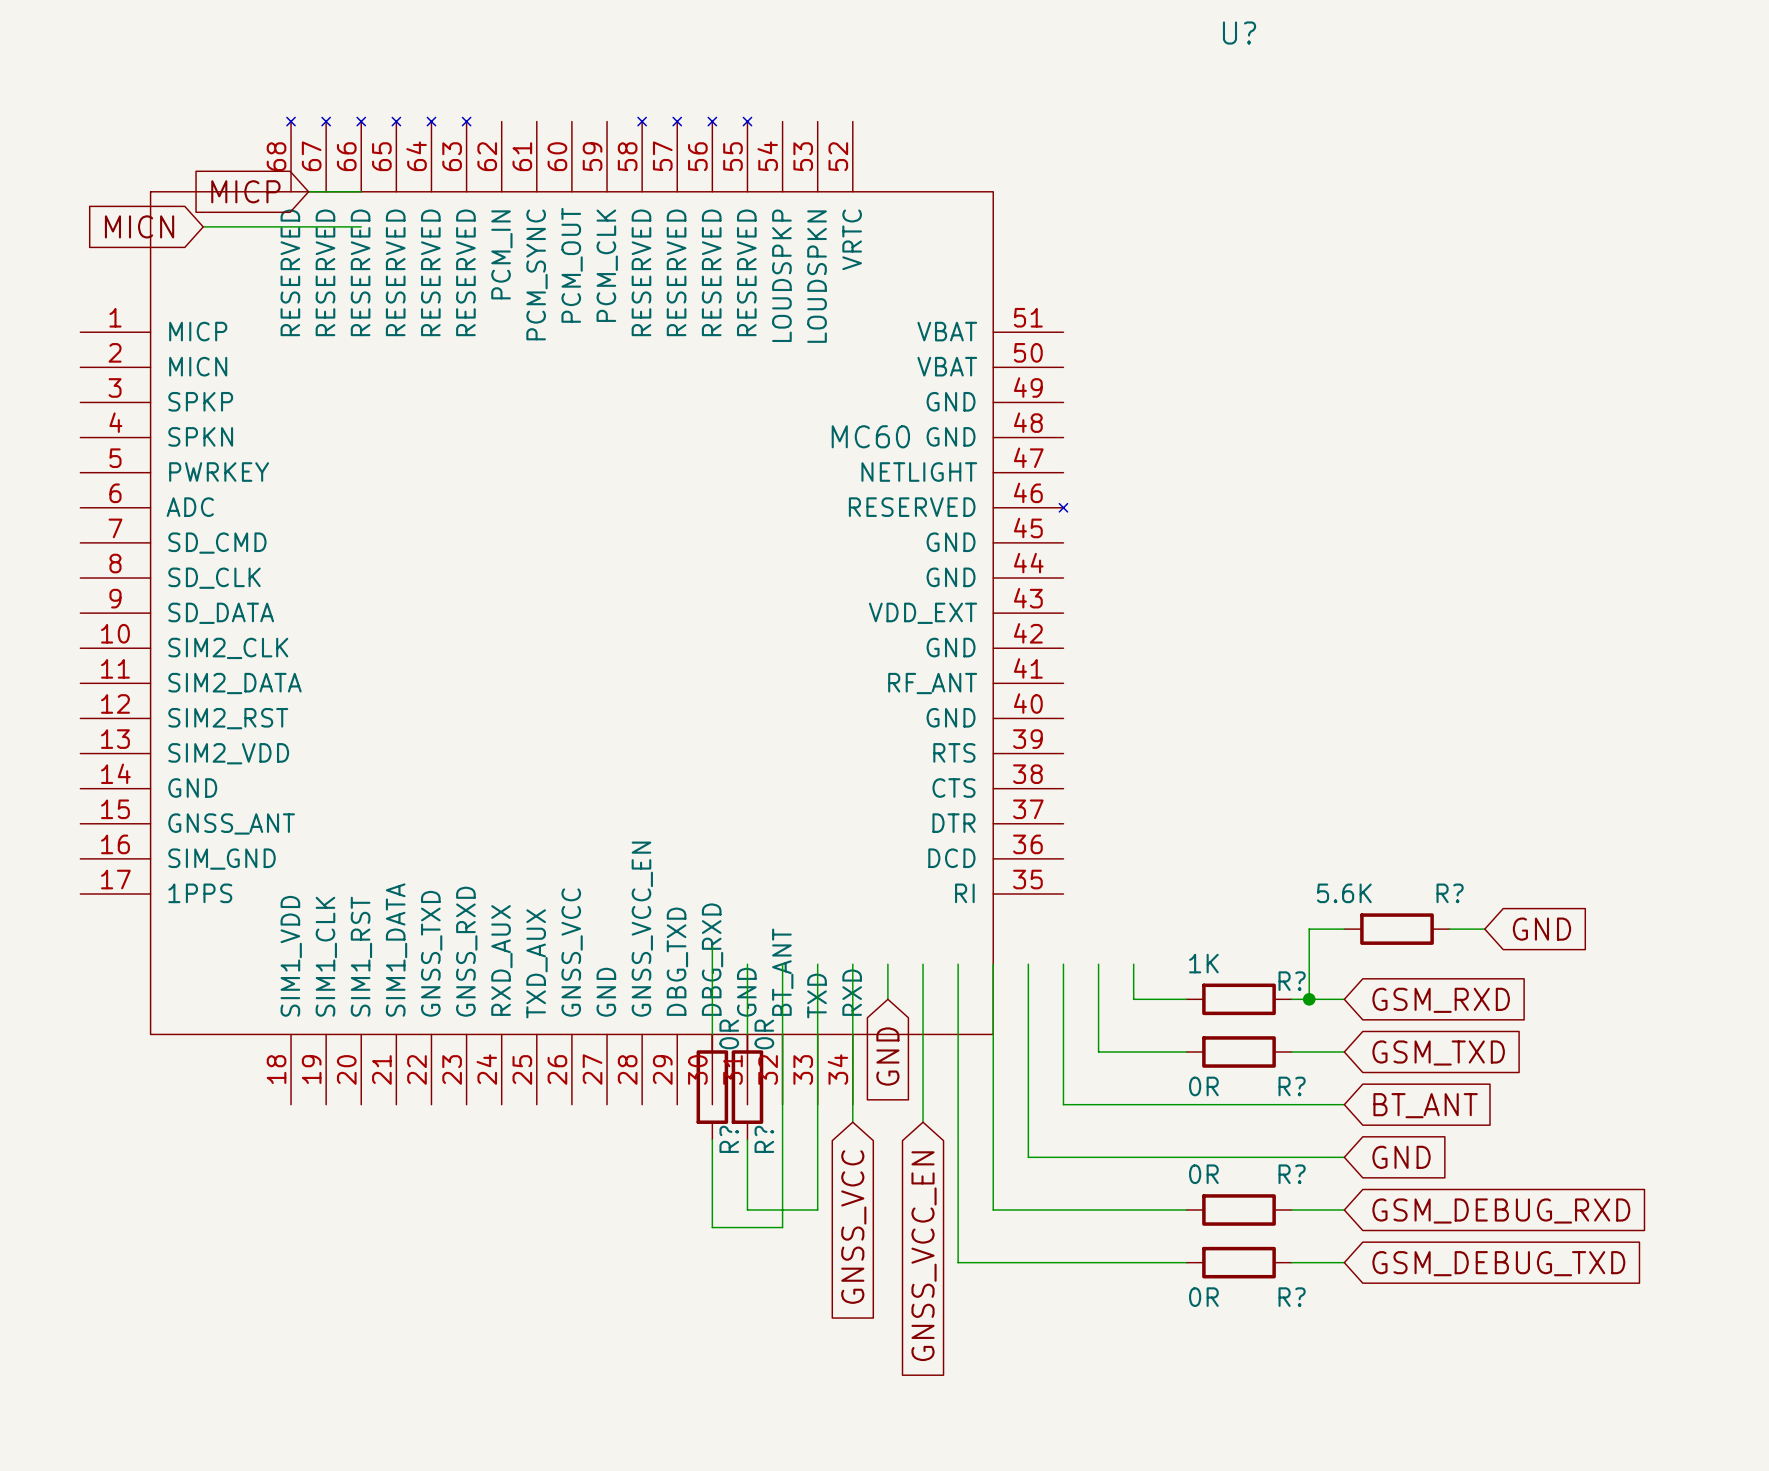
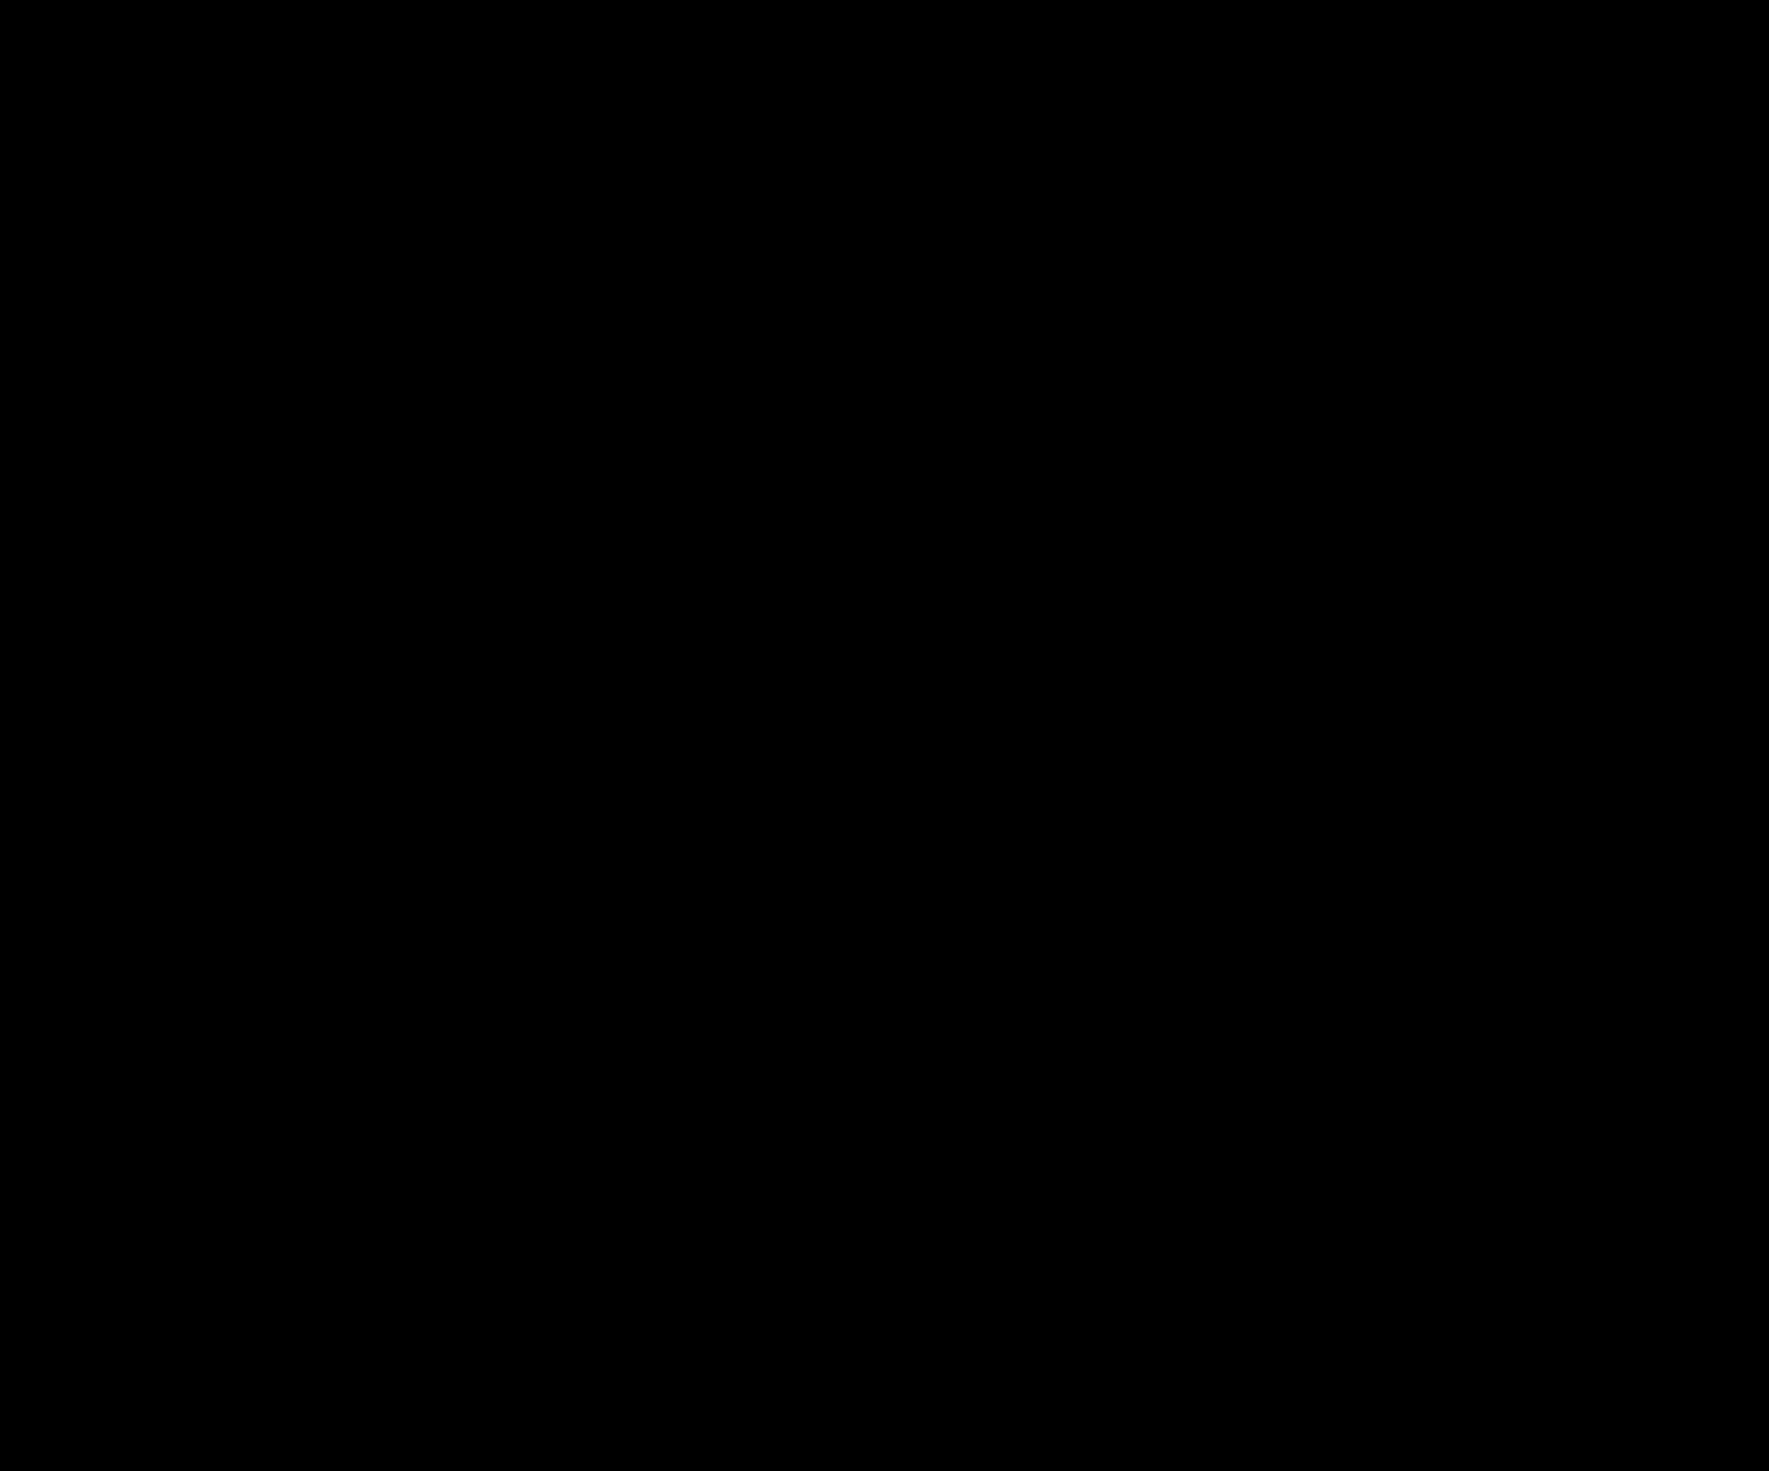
global label: MICP (245, 191) -> none
wire: (308, 191) (361, 191) -> none
global label: MICN (139, 226) -> none
wire: (203, 226) (361, 226) -> none
U?: MC60 (573, 611) -> none
wire: (1344, 929) (1309, 929) (1309, 999) -> none
R?: 5.6K (1397, 929) -> none
wire: (1449, 929) (1484, 929) -> none
global label: GND (1541, 929) -> none
wire: (712, 946) (712, 1034) -> none
wire: (747, 964) (747, 1034) -> none
wire: (782, 964) (782, 1227) (712, 1227) (712, 1139) -> none
wire: (817, 964) (817, 1209) (747, 1209) (747, 1139) -> none
wire: (852, 964) (852, 1122) -> none
wire: (887, 964) (887, 999) -> none
wire: (923, 964) (923, 1122) -> none
wire: (958, 964) (958, 1262) (1186, 1262) -> none
wire: (993, 964) (993, 1209) (1186, 1209) -> none
wire: (1028, 964) (1028, 1157) (1344, 1157) -> none
wire: (1063, 964) (1063, 1104) (1344, 1104) -> none
wire: (1098, 964) (1098, 1052) (1186, 1052) -> none
wire: (1133, 964) (1133, 999) (1186, 999) -> none
R?: 1K (1239, 999) -> none
wire: (1291, 999) (1344, 999) -> none
junction: (1309, 999) -> none
global label: GSM_RXD (1441, 1000) -> none
R?: 0R (1239, 1052) -> none
wire: (1291, 1052) (1344, 1052) -> none
global label: GSM_TXD (1438, 1053) -> none
global label: GND (887, 1056) -> none
R?: 0R (712, 1087) -> none
R?: 0R (747, 1087) -> none
global label: BT_ANT (1425, 1105) -> none
global label: GND (1401, 1157) -> none
R?: 0R (1239, 1209) -> none
wire: (1291, 1209) (1344, 1209) -> none
global label: GSM_DEBUG_RXD (1501, 1211) -> none
global label: GNSS_VCC (853, 1227) -> none
global label: GNSS_VCC_EN (924, 1256) -> none
R?: 0R (1239, 1262) -> none
wire: (1291, 1262) (1344, 1262) -> none
global label: GSM_DEBUG_TXD (1498, 1263) -> none

